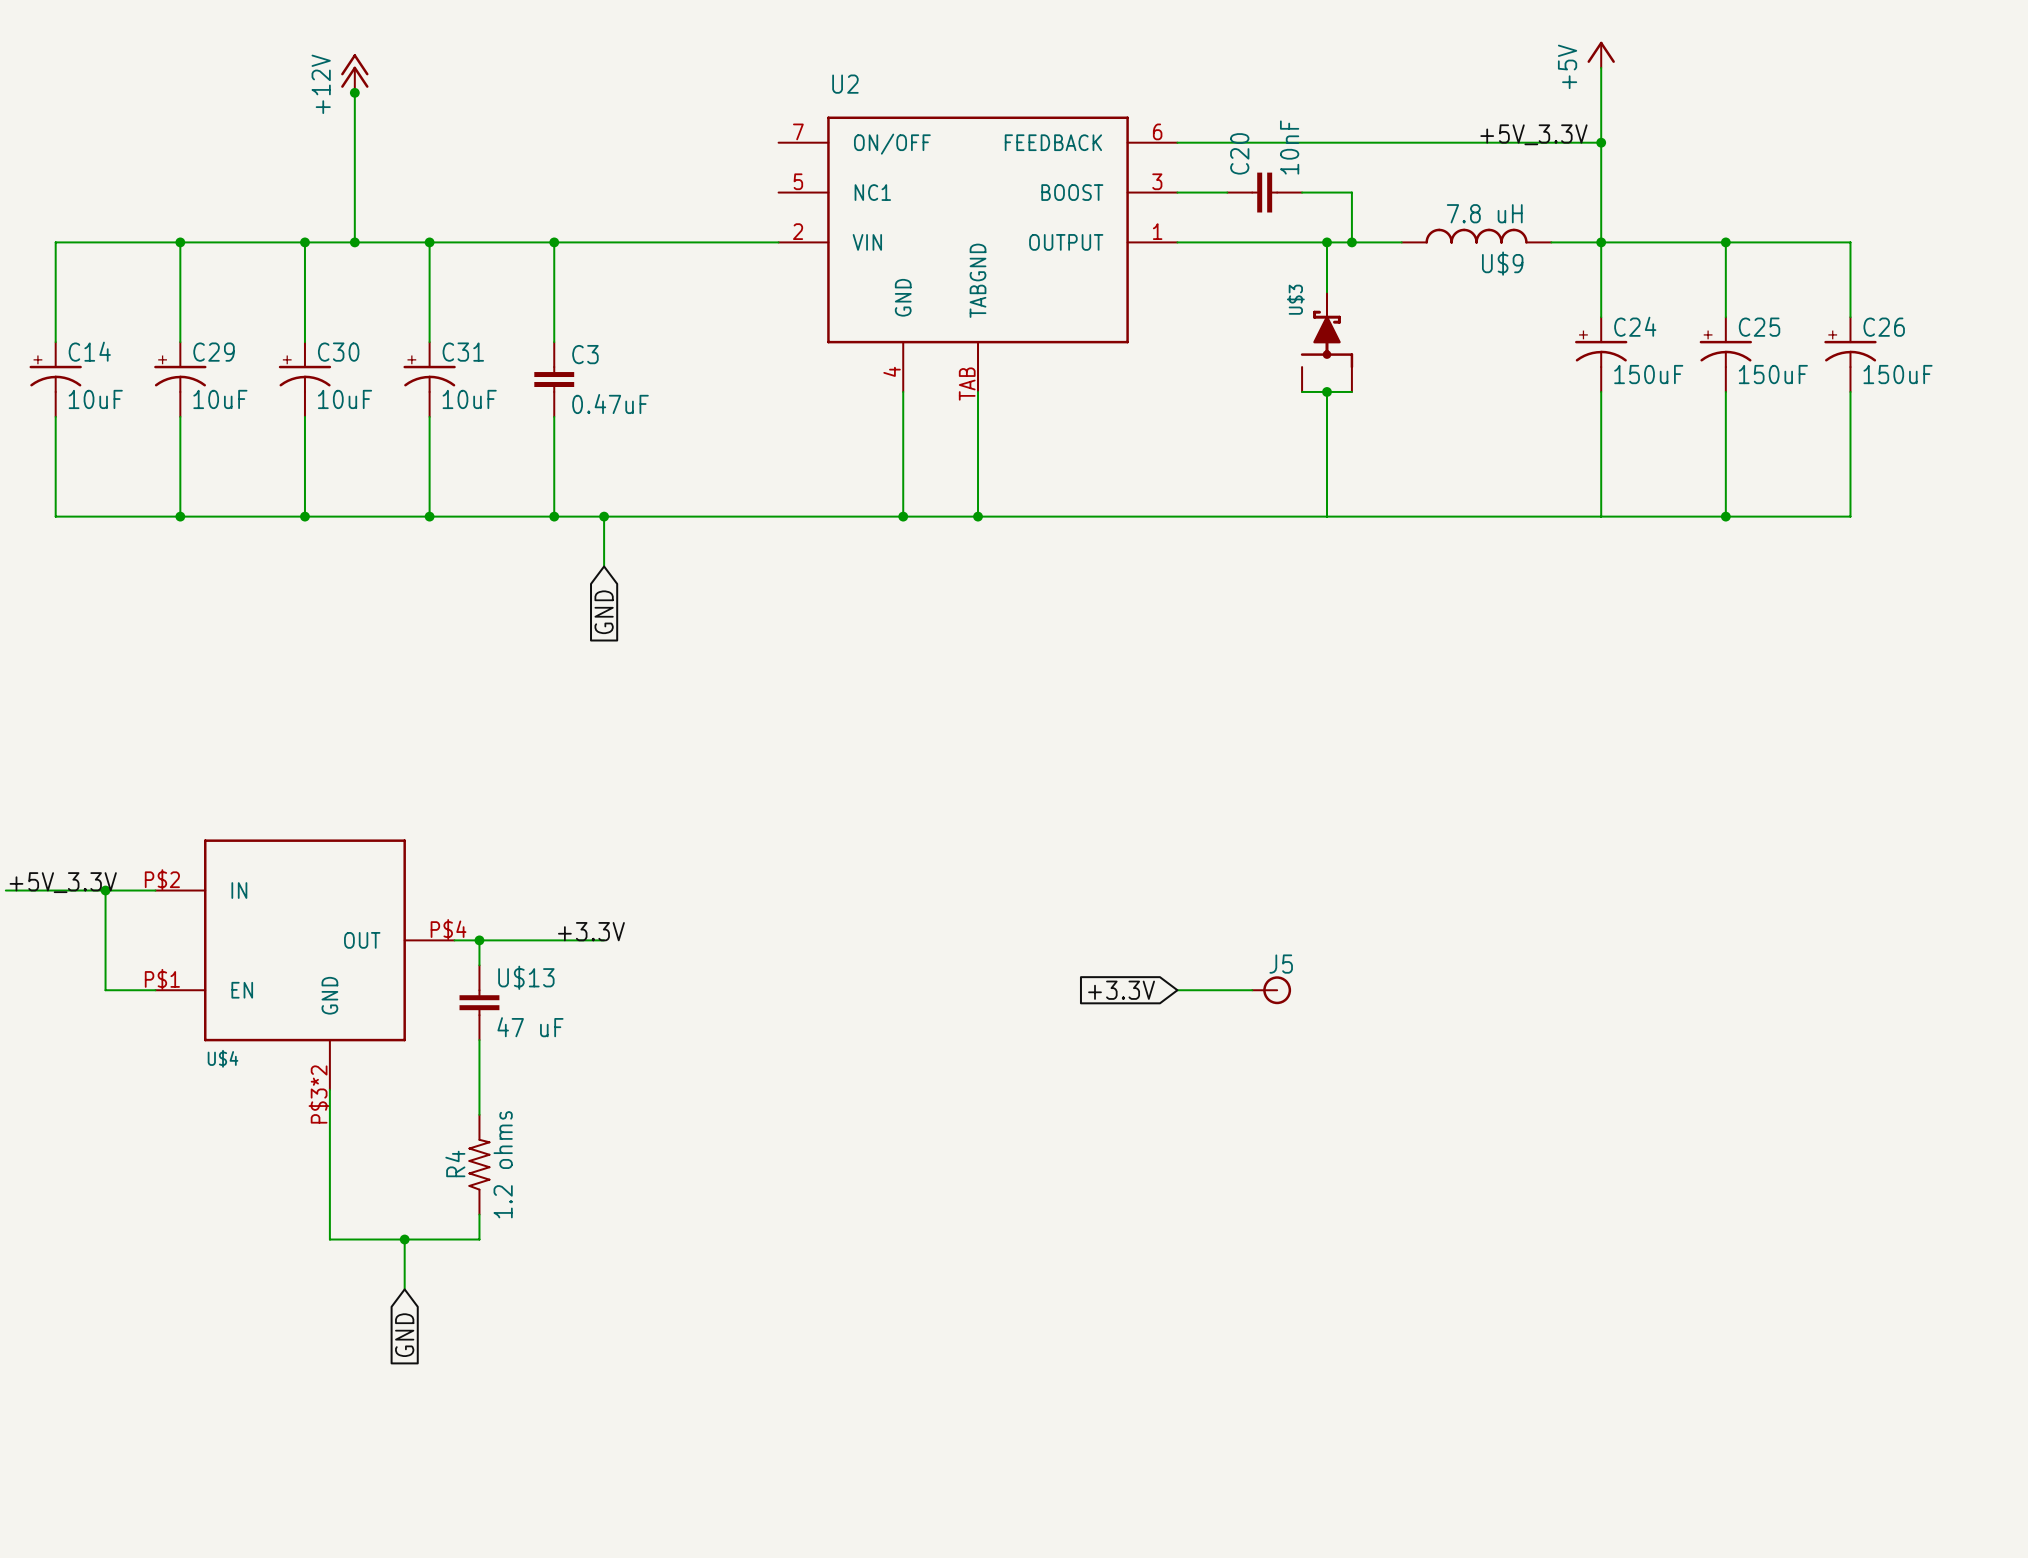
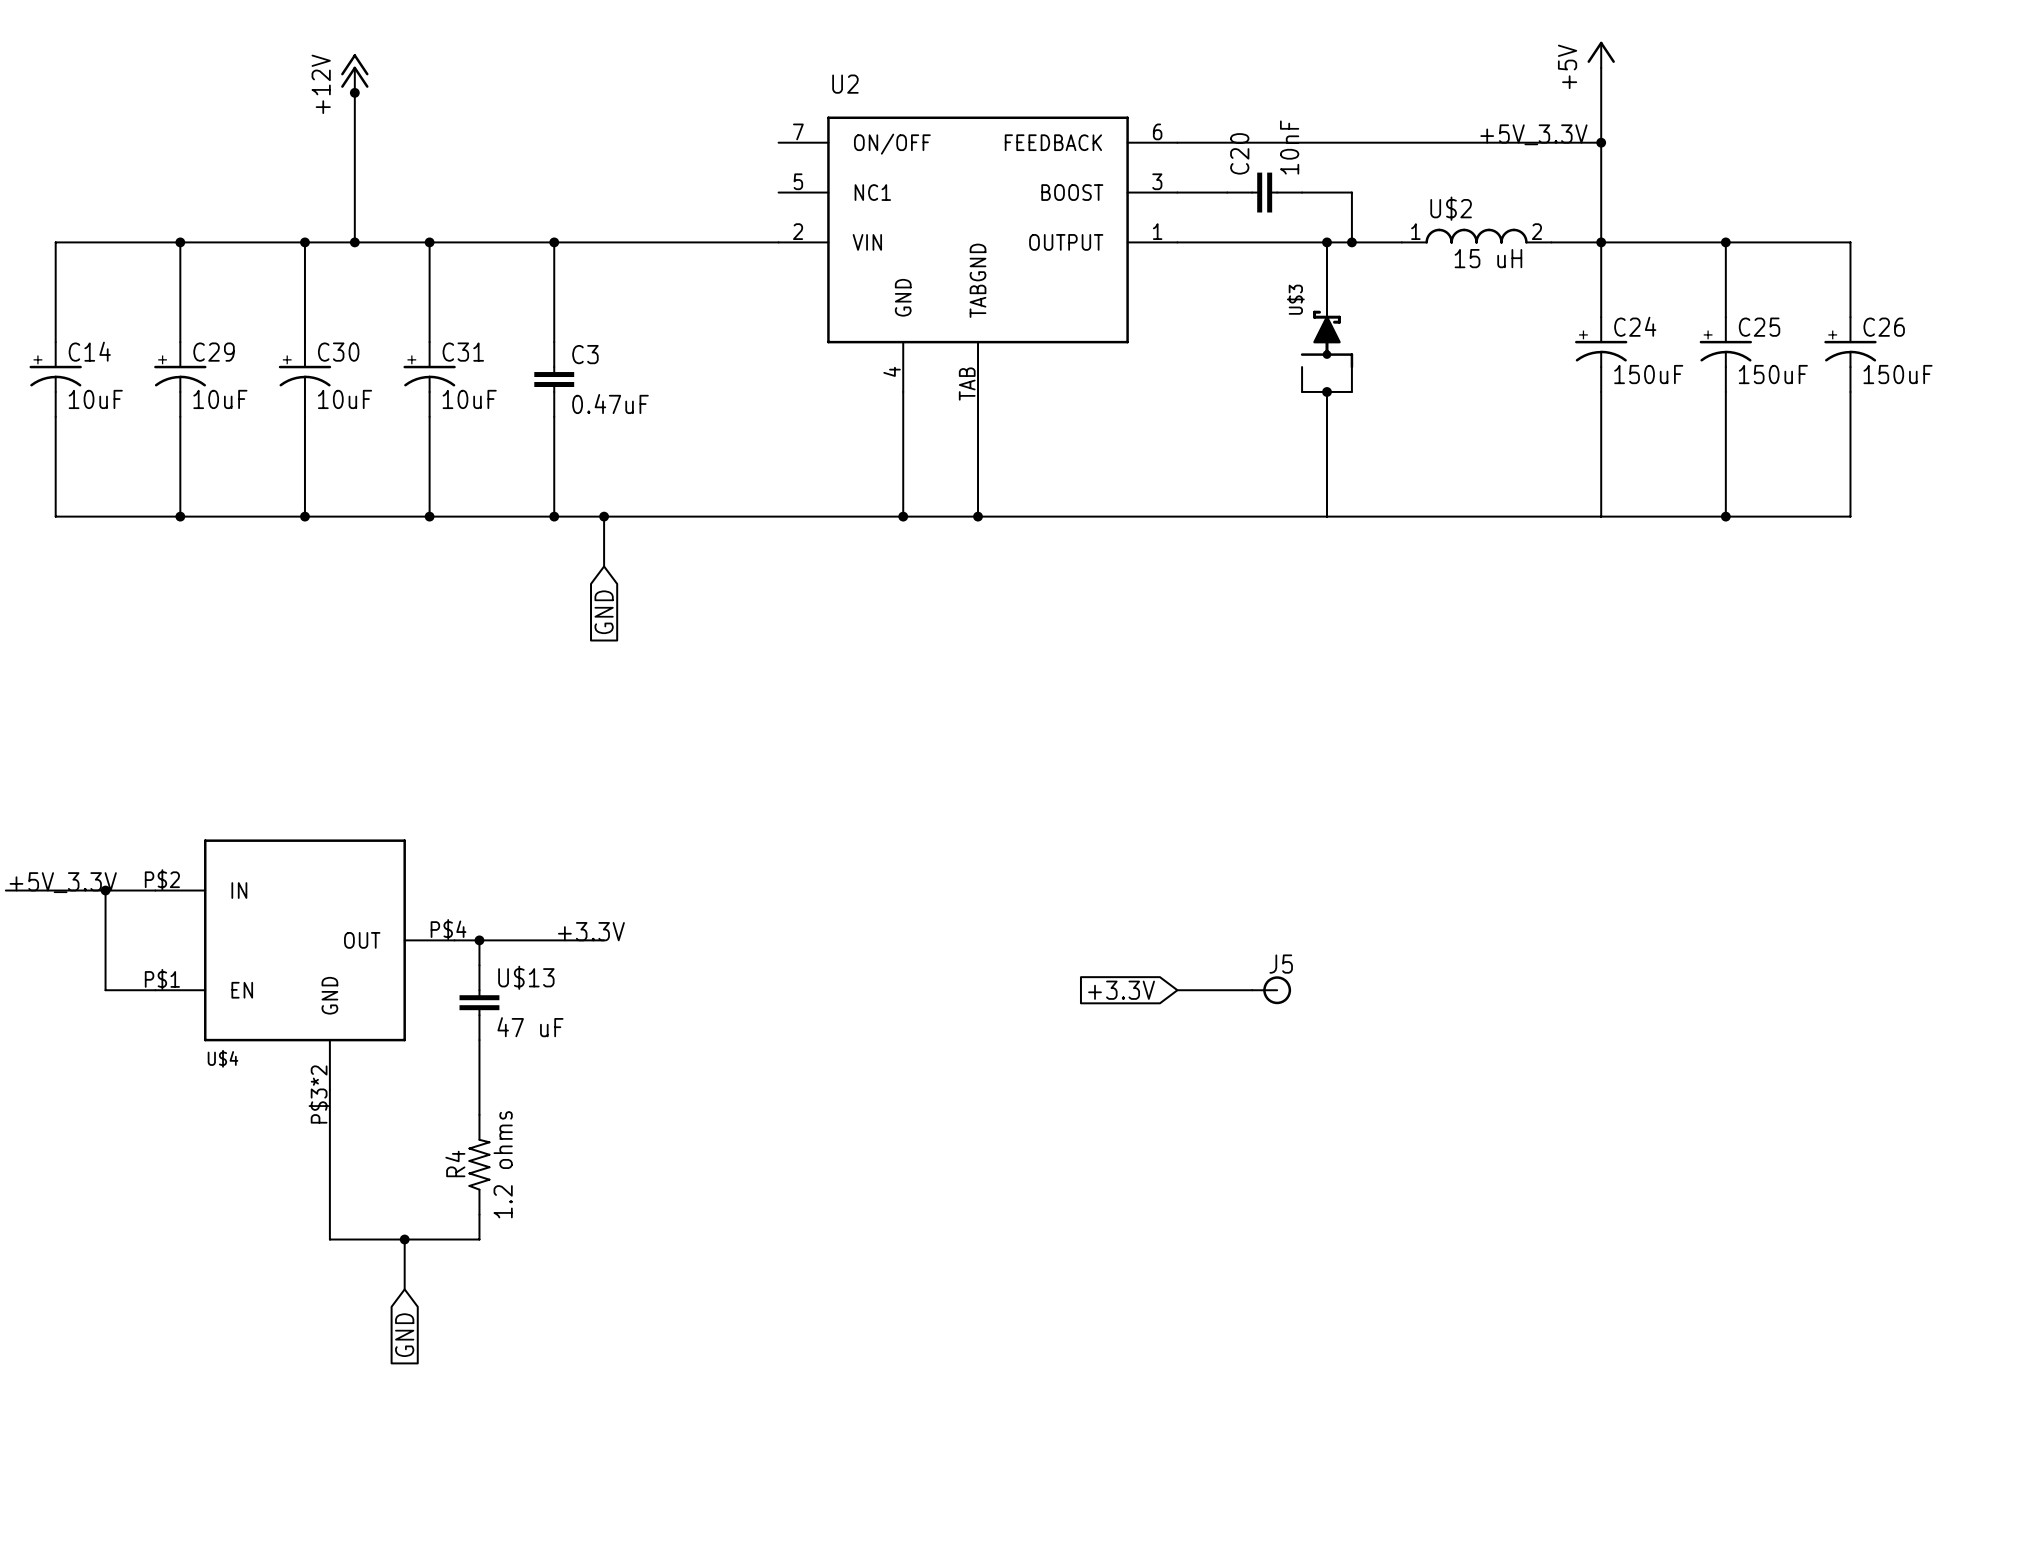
U$9 value: 7.8 uH (1484, 213) -> none
U$9 pin number: none -> 1 (1415, 231)
U$9 pin number: none -> 2 (1536, 231)
U$9 text: none -> 15 uH (1488, 258)
U$9 name: U$9 (1502, 263) -> U$2 (1451, 208)

